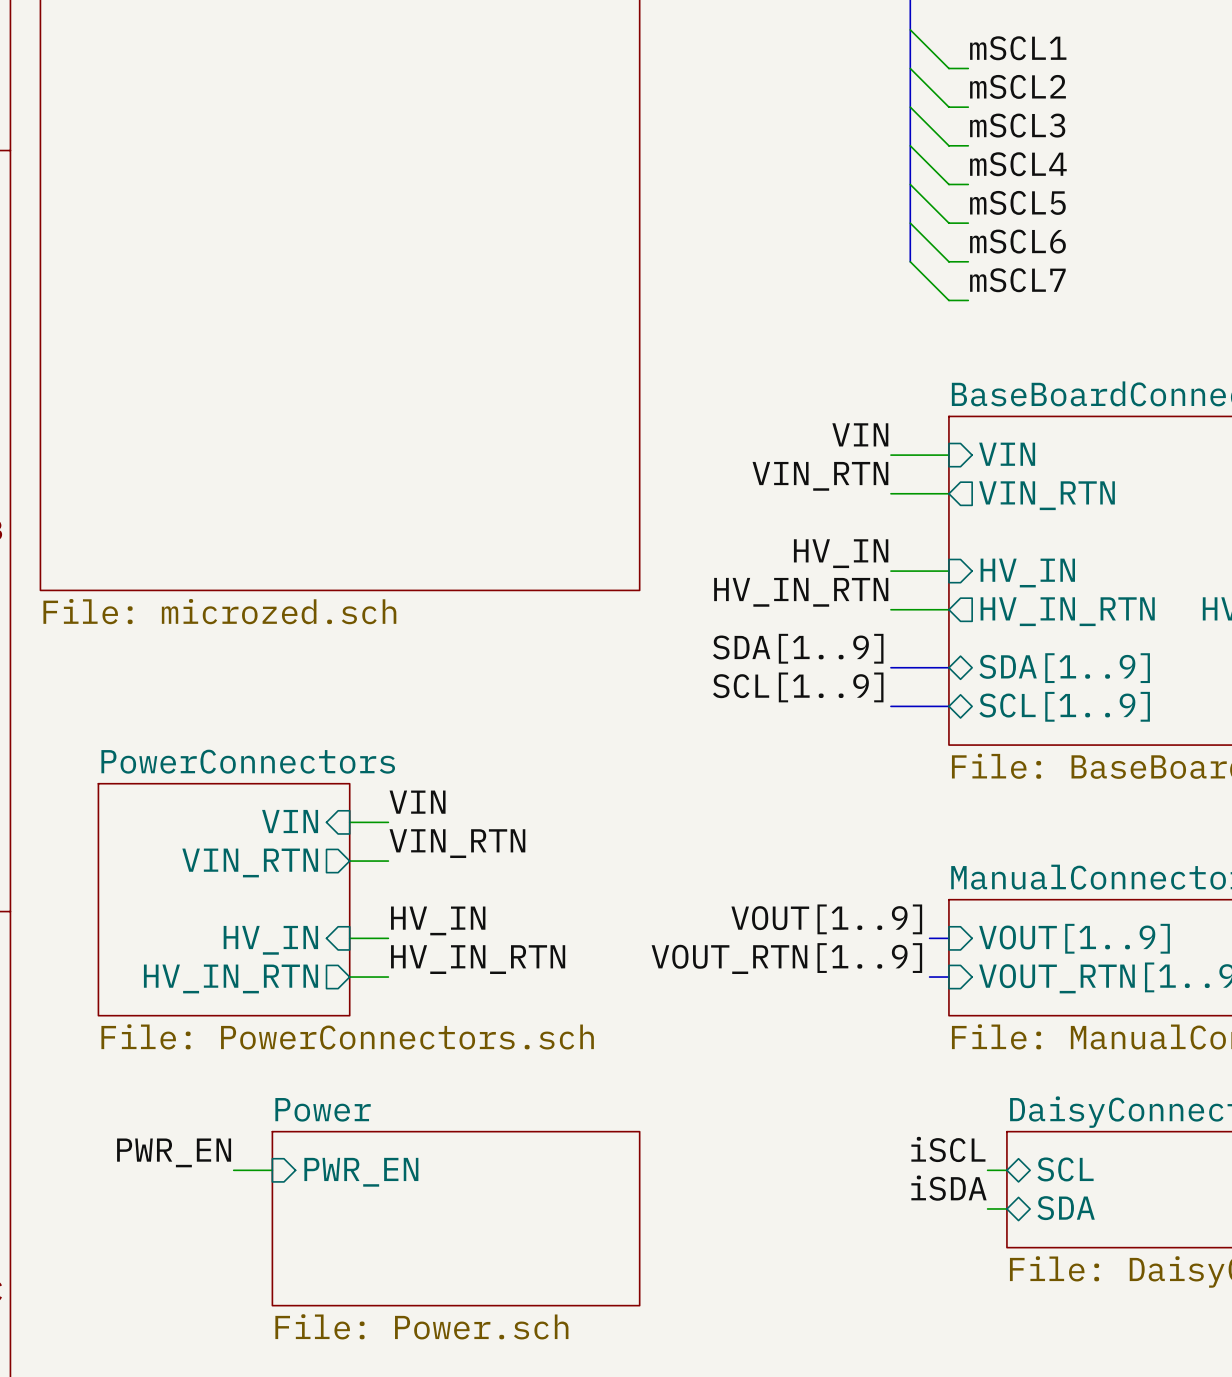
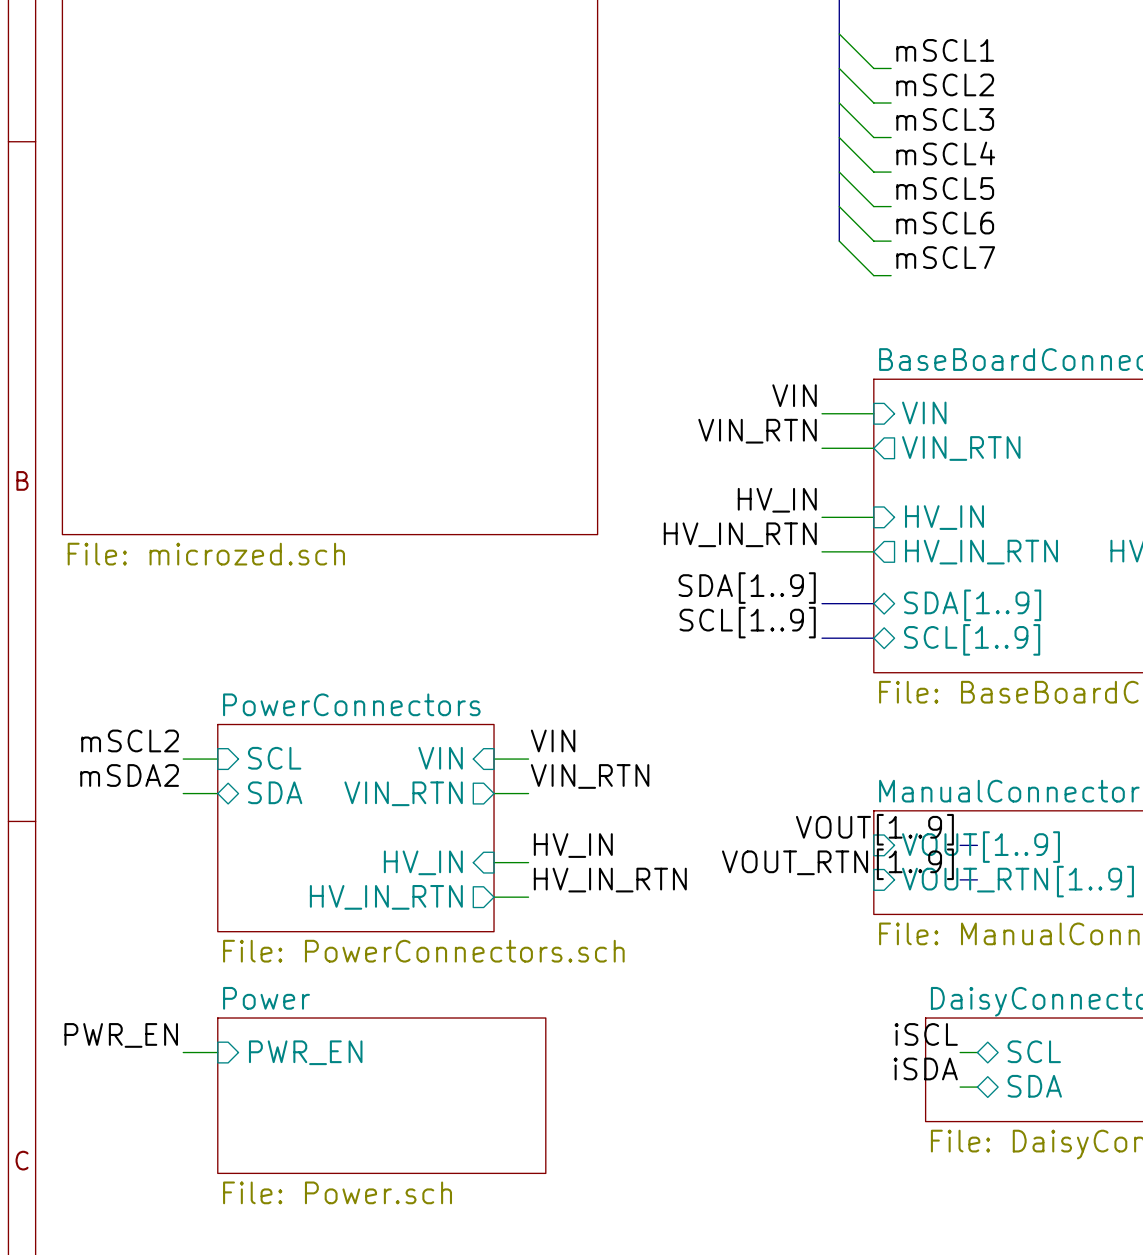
label position: VIN (417, 802) -> VIN (553, 740)
label: none -> mSCL2 (130, 740)
sheet pin position: VIN (290, 821) -> VIN (440, 758)
wire: (349, 822) (388, 822) -> (494, 759) (528, 759)
sheet pin: none -> SCL (274, 758)
wire: none -> (183, 759) (217, 759)
label position: VIN_RTN (457, 843) -> VIN_RTN (590, 776)
label: none -> mSDA2 (129, 775)
wire: (349, 861) (388, 861) -> (494, 793) (528, 793)
sheet pin position: VIN_RTN (250, 862) -> VIN_RTN (403, 793)
sheet pin: none -> SDA (275, 792)
wire: none -> (183, 793) (217, 793)
sheet PowerConnectors: File: PowerConnectors.sch (224, 899) -> none
sheet PowerConnectors: none -> File: PowerConnectors.sch (355, 828)
label position: VOUT[1..9] (826, 919) -> VOUT[1..9] (874, 829)
label position: HV_IN (438, 920) -> HV_IN (573, 845)
wire: (349, 938) (388, 938) -> (494, 862) (528, 862)
bus: (929, 938) (948, 938) -> (960, 845) (977, 845)
sheet pin position: HV_IN (270, 940) -> HV_IN (423, 862)
label position: VOUT_RTN[1..9] (786, 958) -> VOUT_RTN[1..9] (837, 864)
label position: HV_IN_RTN (478, 959) -> HV_IN_RTN (610, 880)
wire: (349, 977) (388, 977) -> (494, 897) (528, 897)
bus: (929, 977) (948, 977) -> (960, 879) (977, 879)
sheet pin position: HV_IN_RTN (230, 978) -> HV_IN_RTN (386, 897)
label position: iSCL (948, 1149) -> iSCL (926, 1034)
label position: PWR_EN (174, 1152) -> PWR_EN (121, 1035)
sheet pin position: SCL (1065, 1169) -> SCL (1034, 1051)
wire: (233, 1170) (272, 1170) -> (183, 1052) (217, 1052)
wire: (987, 1170) (1006, 1170) -> (960, 1052) (977, 1052)
sheet pin position: PWR_EN (361, 1172) -> PWR_EN (305, 1052)
label position: iSDA (948, 1188) -> iSDA (925, 1068)
wire: (987, 1208) (1006, 1208) -> (960, 1087) (977, 1087)
sheet pin position: SDA (1066, 1208) -> SDA (1034, 1086)
sheet Power position: (456, 1218) -> (381, 1095)

